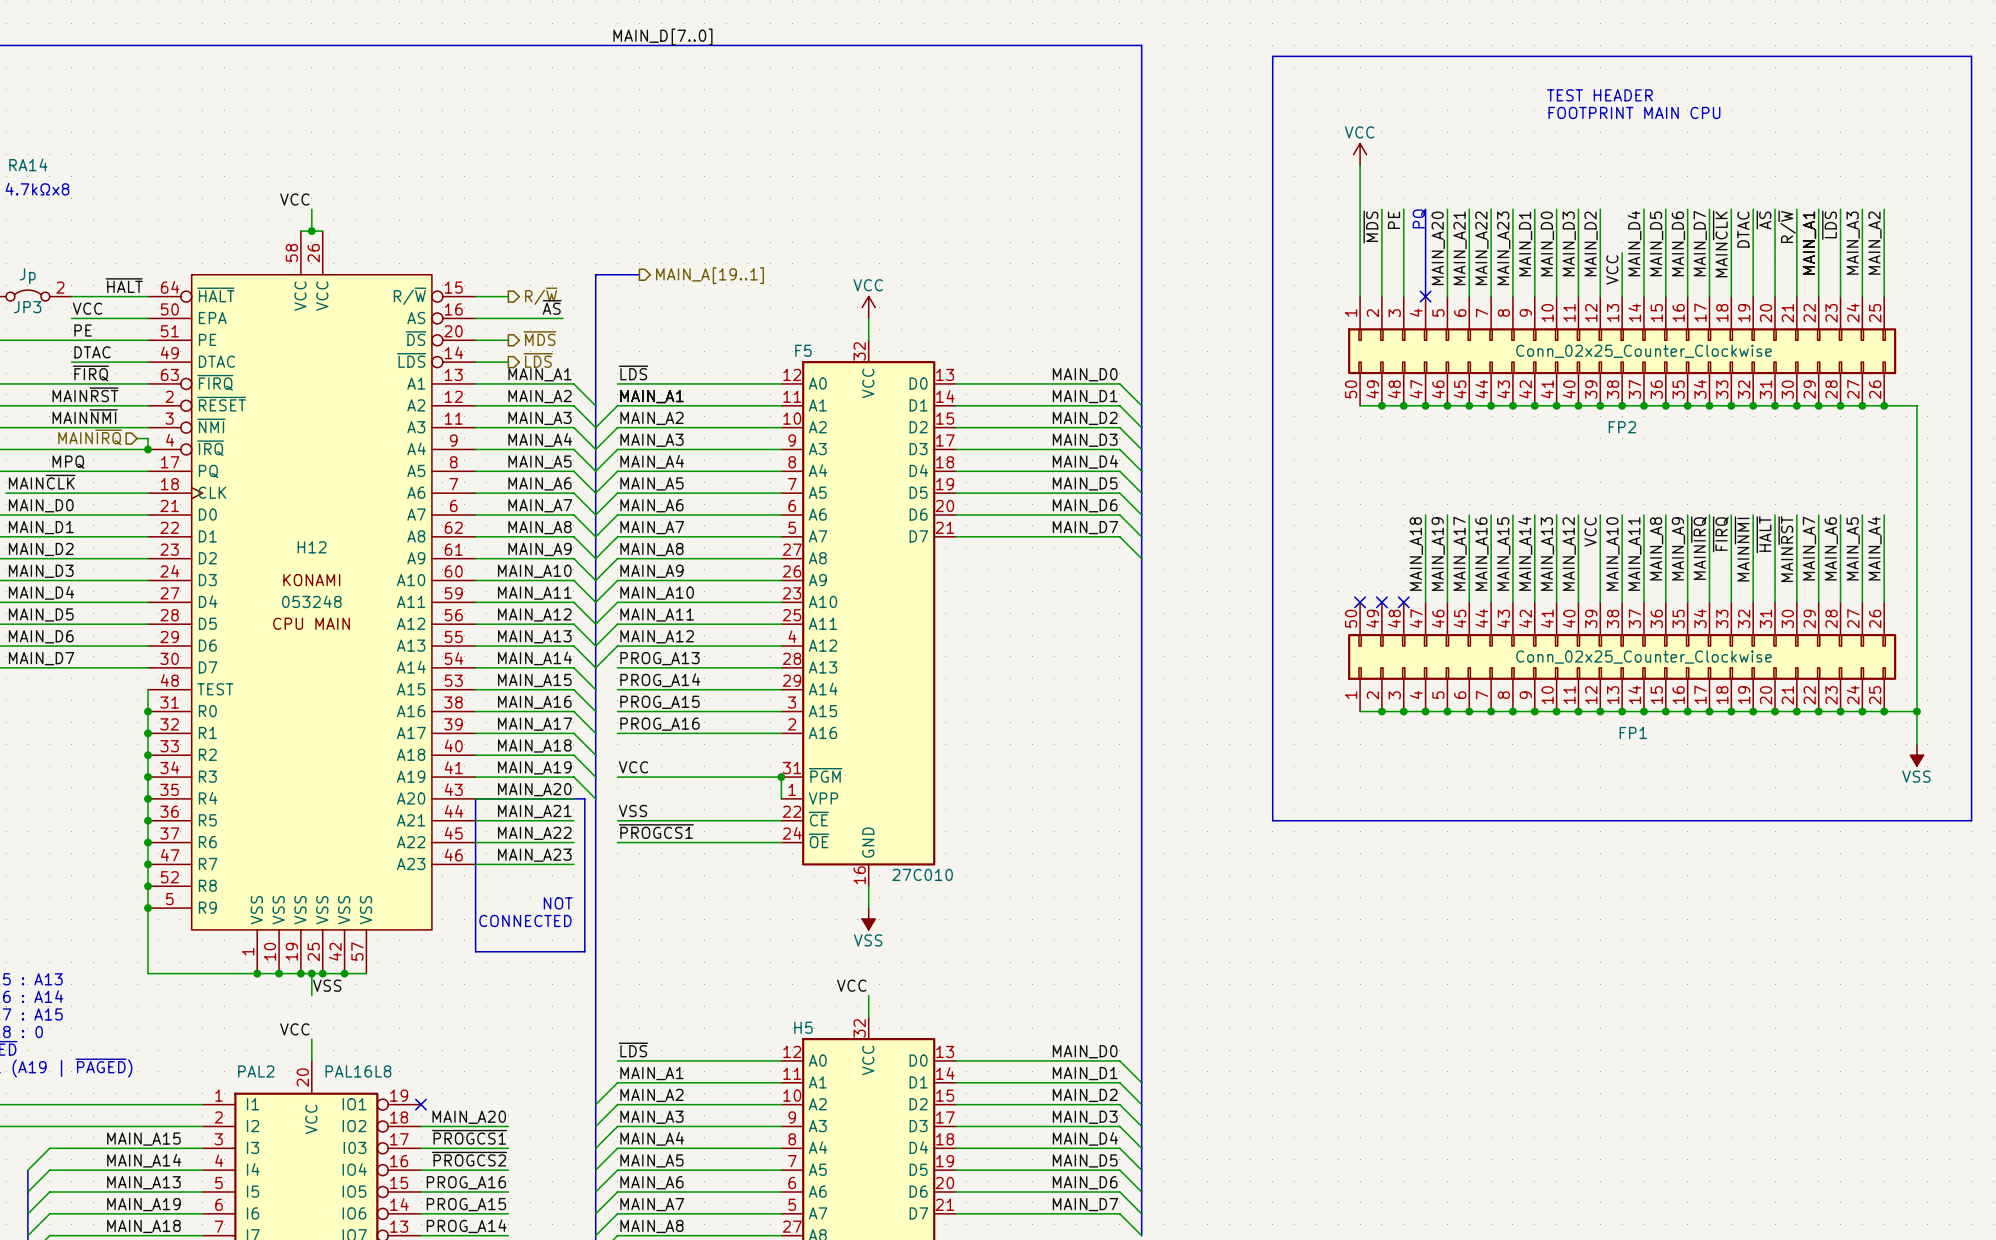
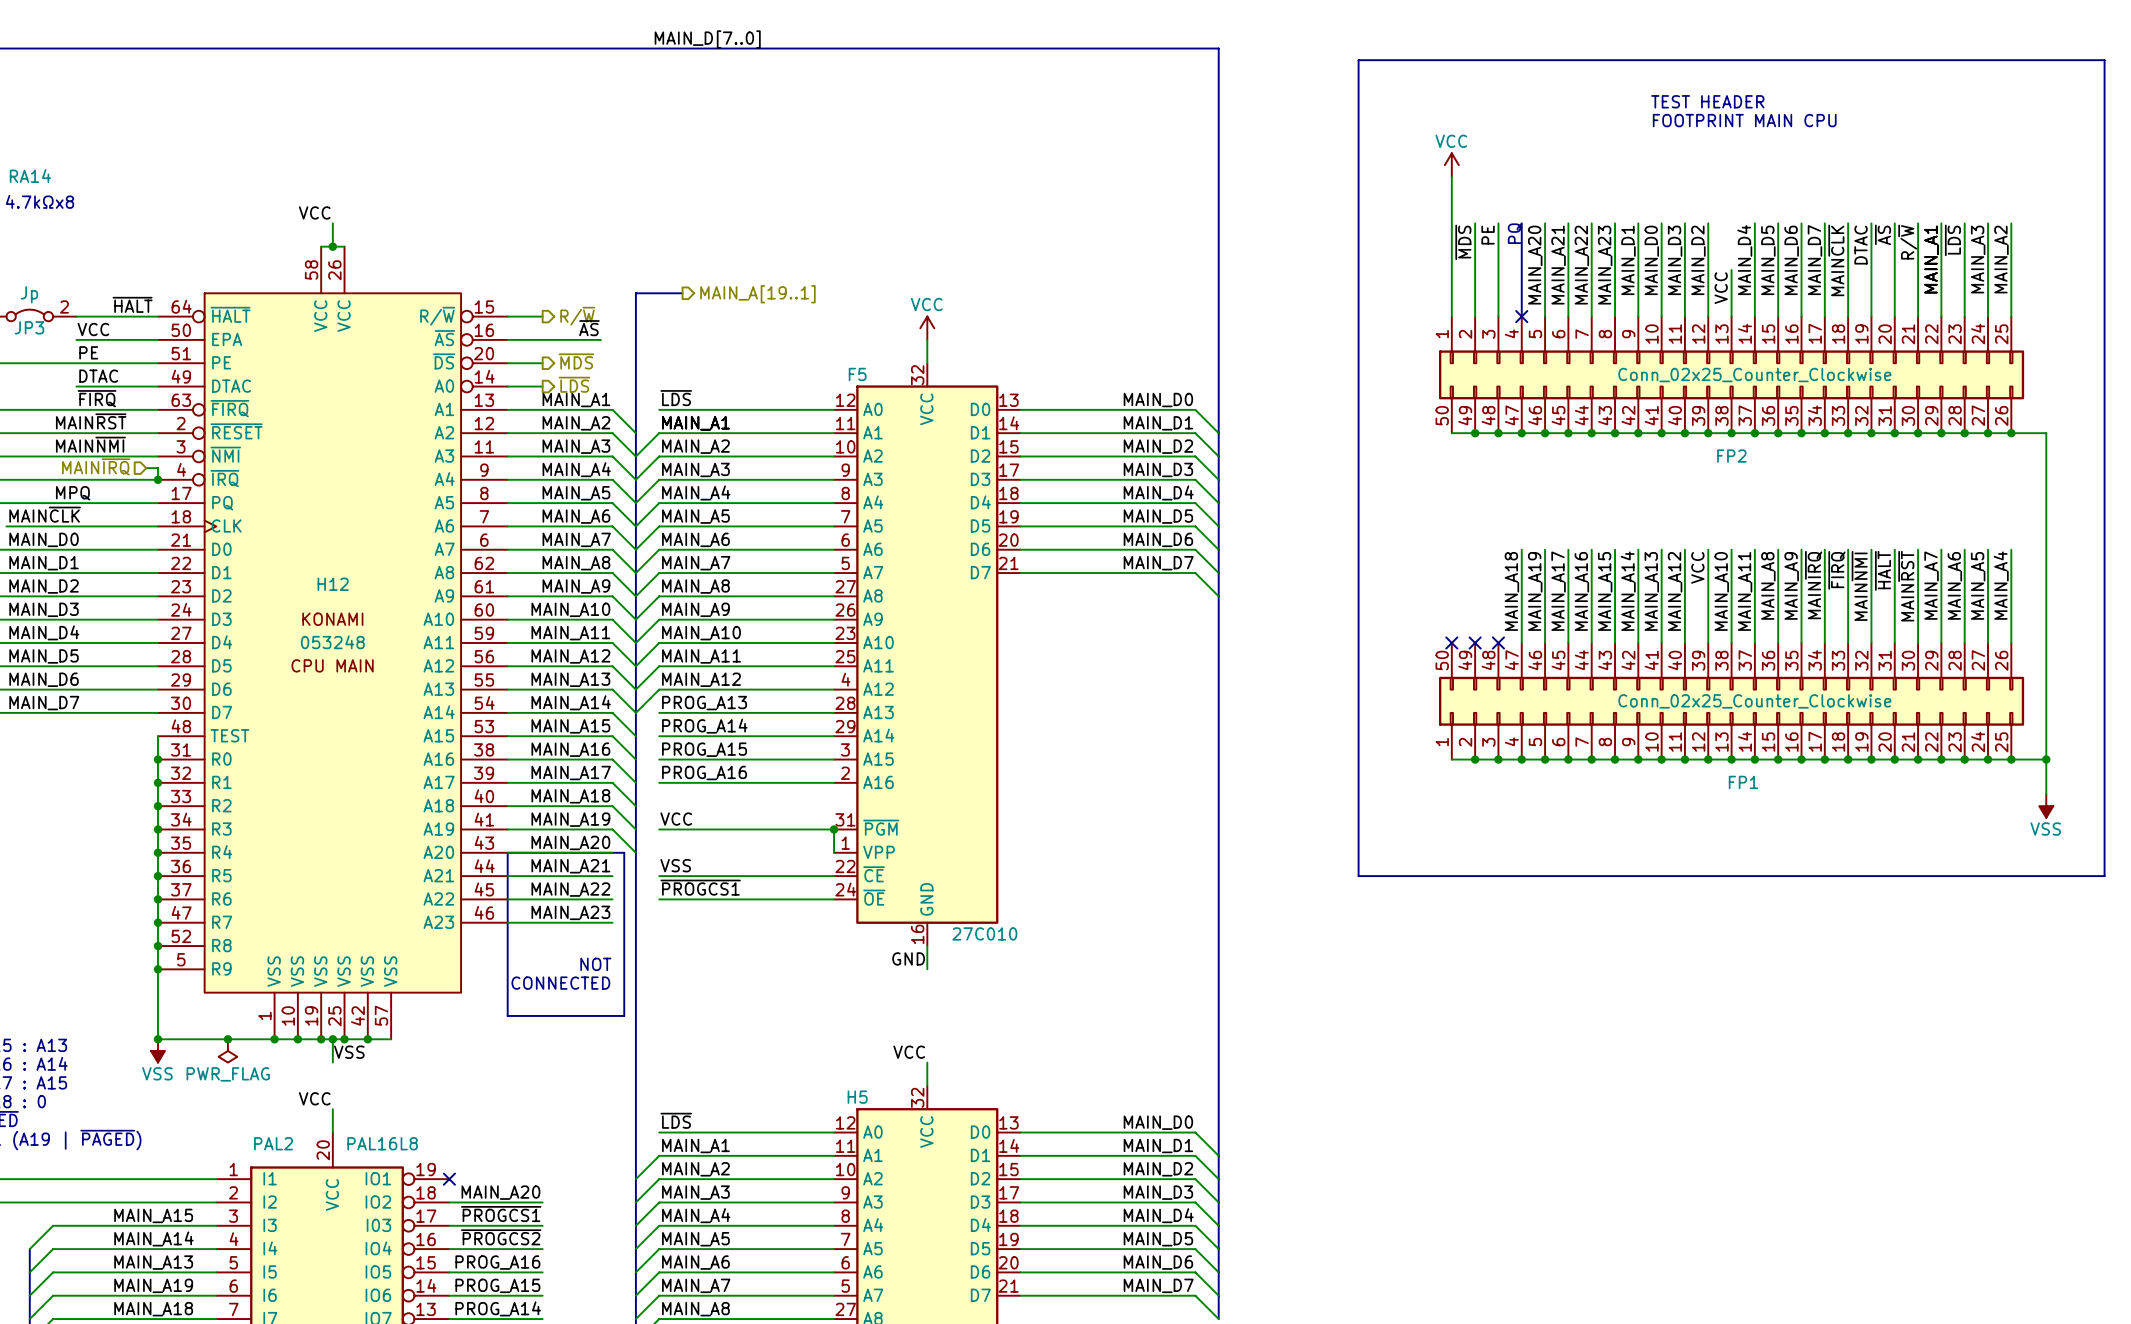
H12 pin name: AS (416, 318) -> ~{AS} (444, 338)
H12 pin name: ~{LDS} (411, 360) -> A0 (444, 386)
label: none -> GND (908, 958)
power symbol: VSS (868, 919) -> none
junction: none -> (158, 1039)
junction: none -> (227, 1039)
power symbol: none -> VSS (158, 1050)
power symbol: none -> PWR_FLAG (227, 1050)

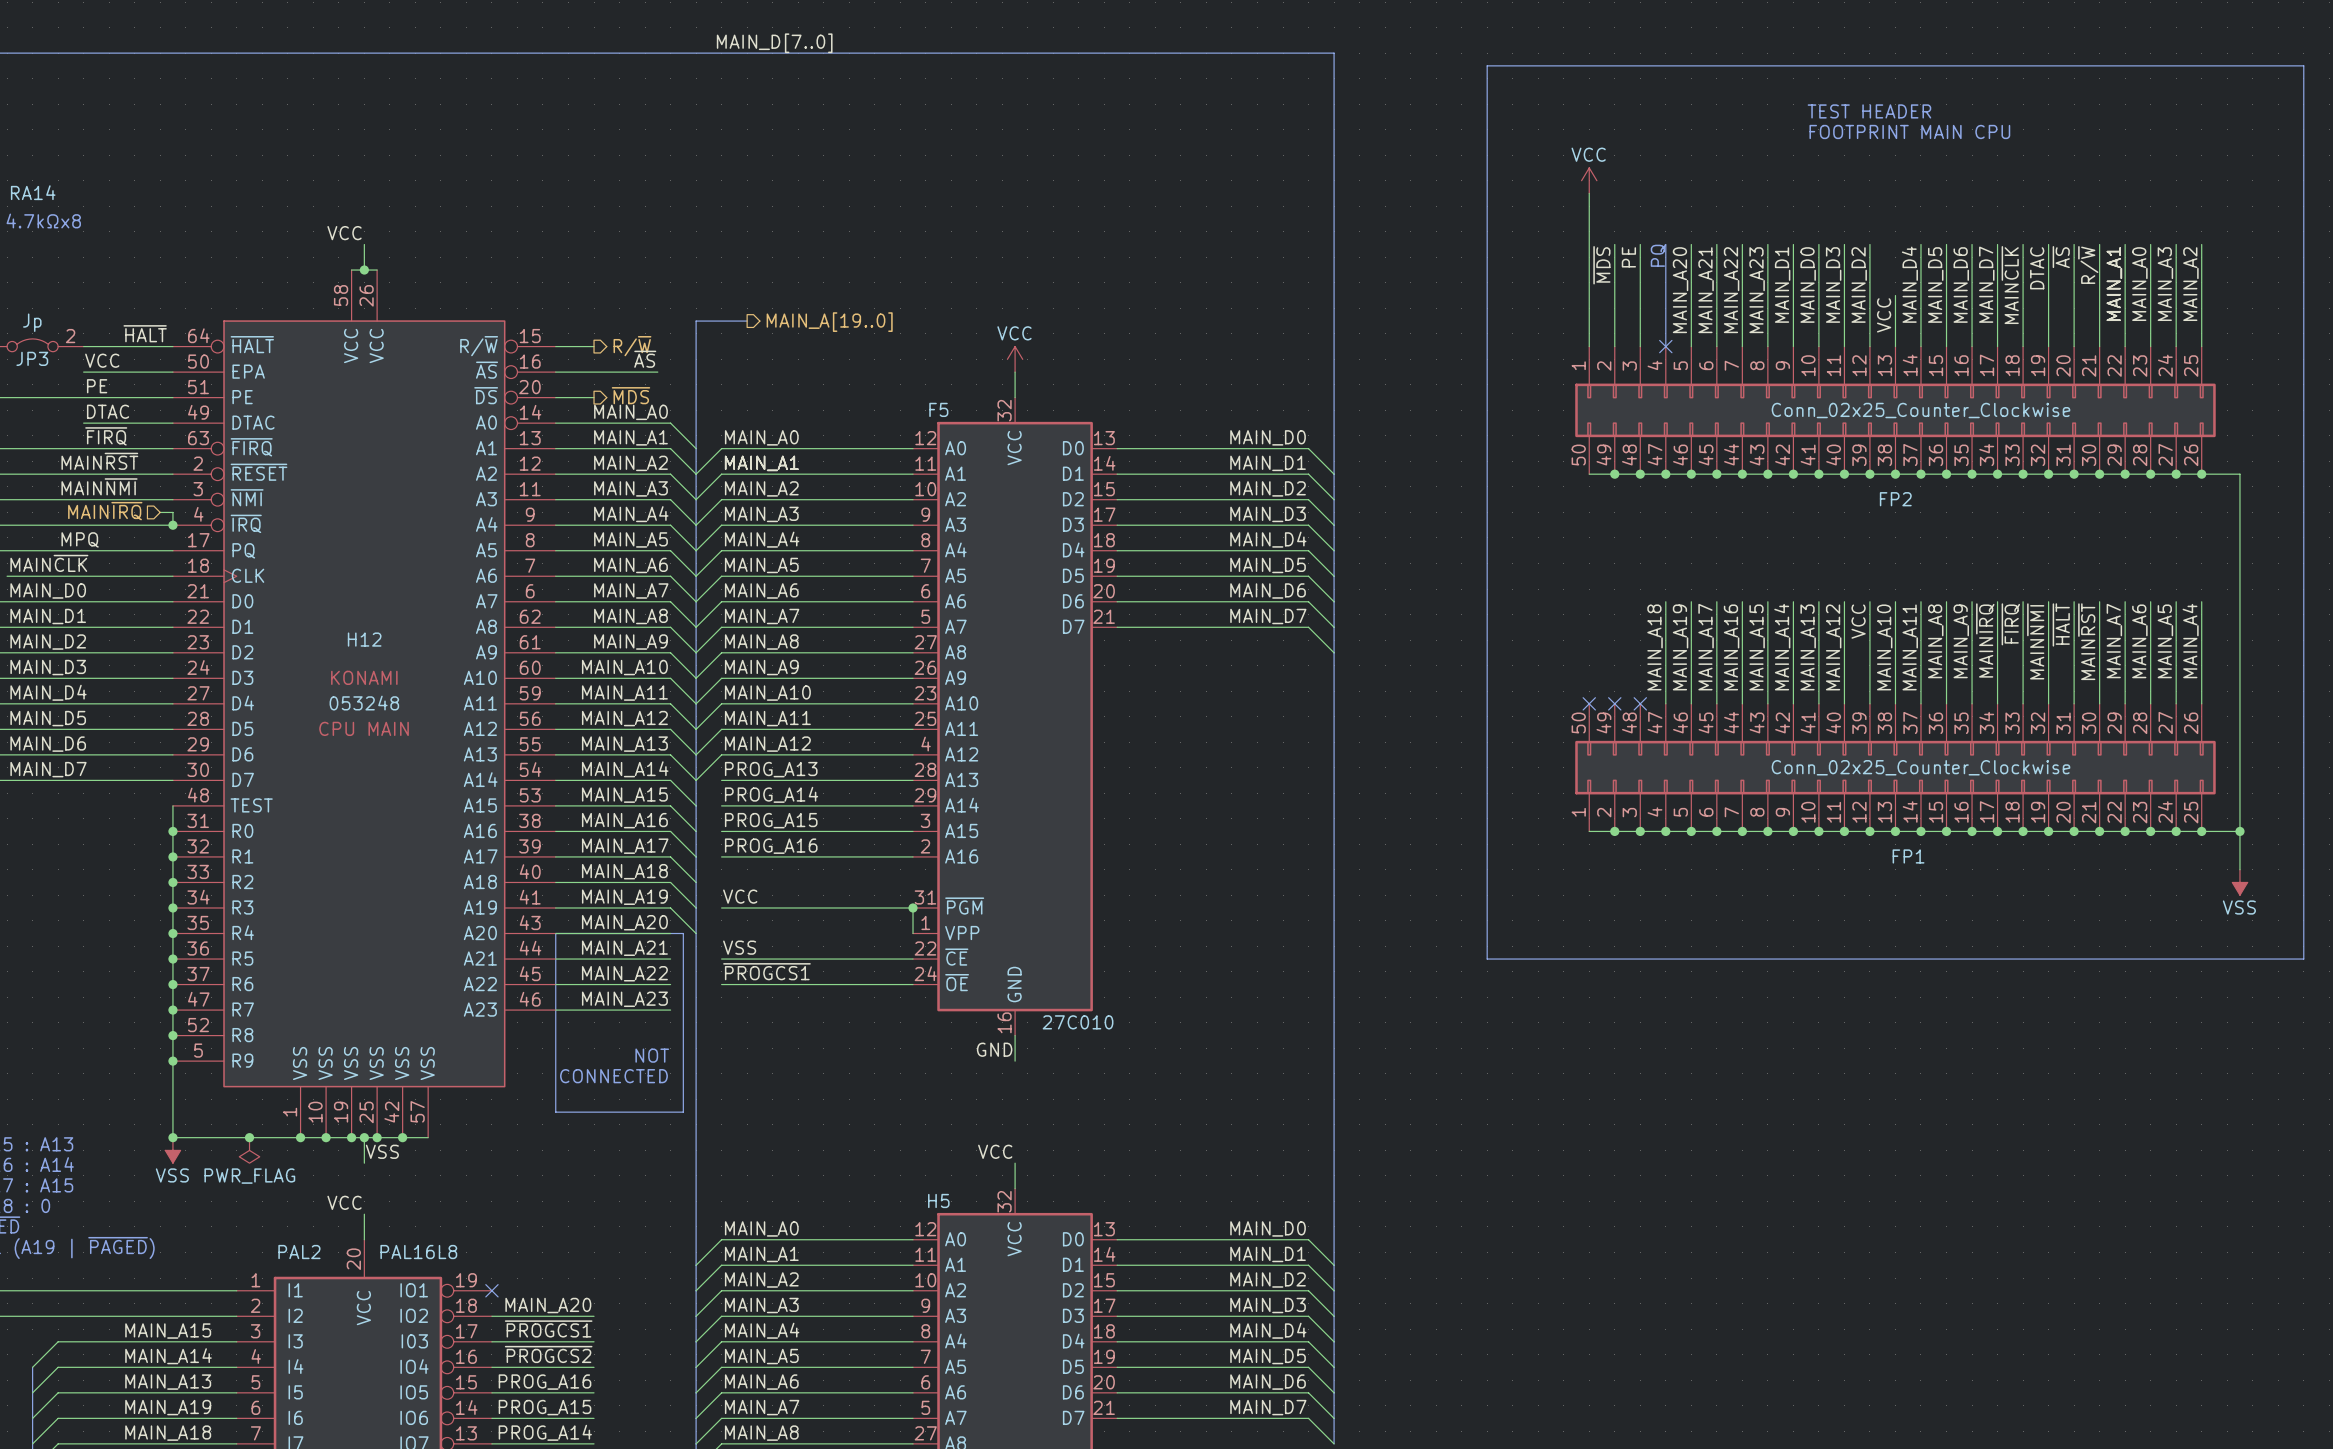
label: ~{LDS} (1952, 240) -> MAIN_A0 (2139, 284)
hierarchical label: MAIN_A[19..1] (757, 294) -> MAIN_A[19..0] (829, 322)
label: none -> MAIN_A0 (630, 412)
hierarchical label: ~{LDS} (574, 384) -> none
wire: none -> (594, 423) (670, 423) (696, 448)
label: ~{LDS} (676, 398) -> MAIN_A0 (761, 437)
wire: none -> (721, 448) (696, 474)
label: ~{LDS} (676, 1120) -> MAIN_A0 (761, 1228)
wire: none -> (721, 1239) (696, 1265)

